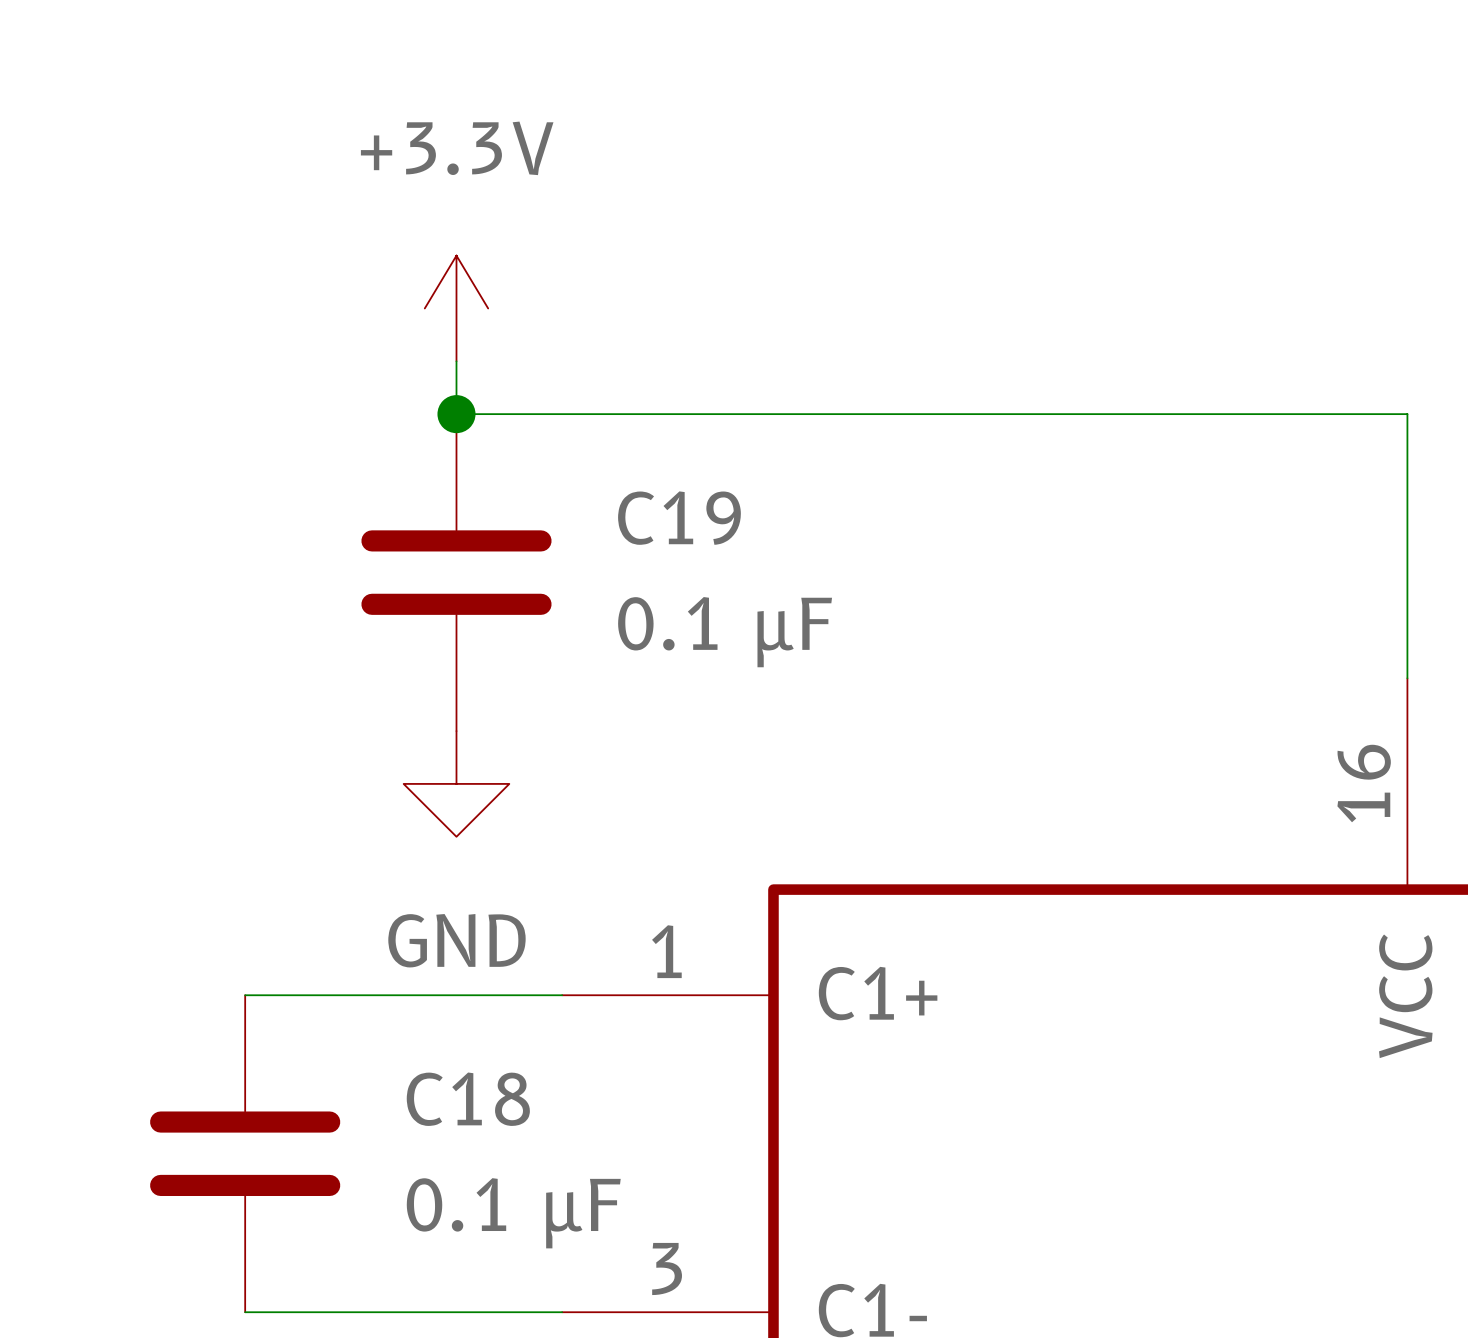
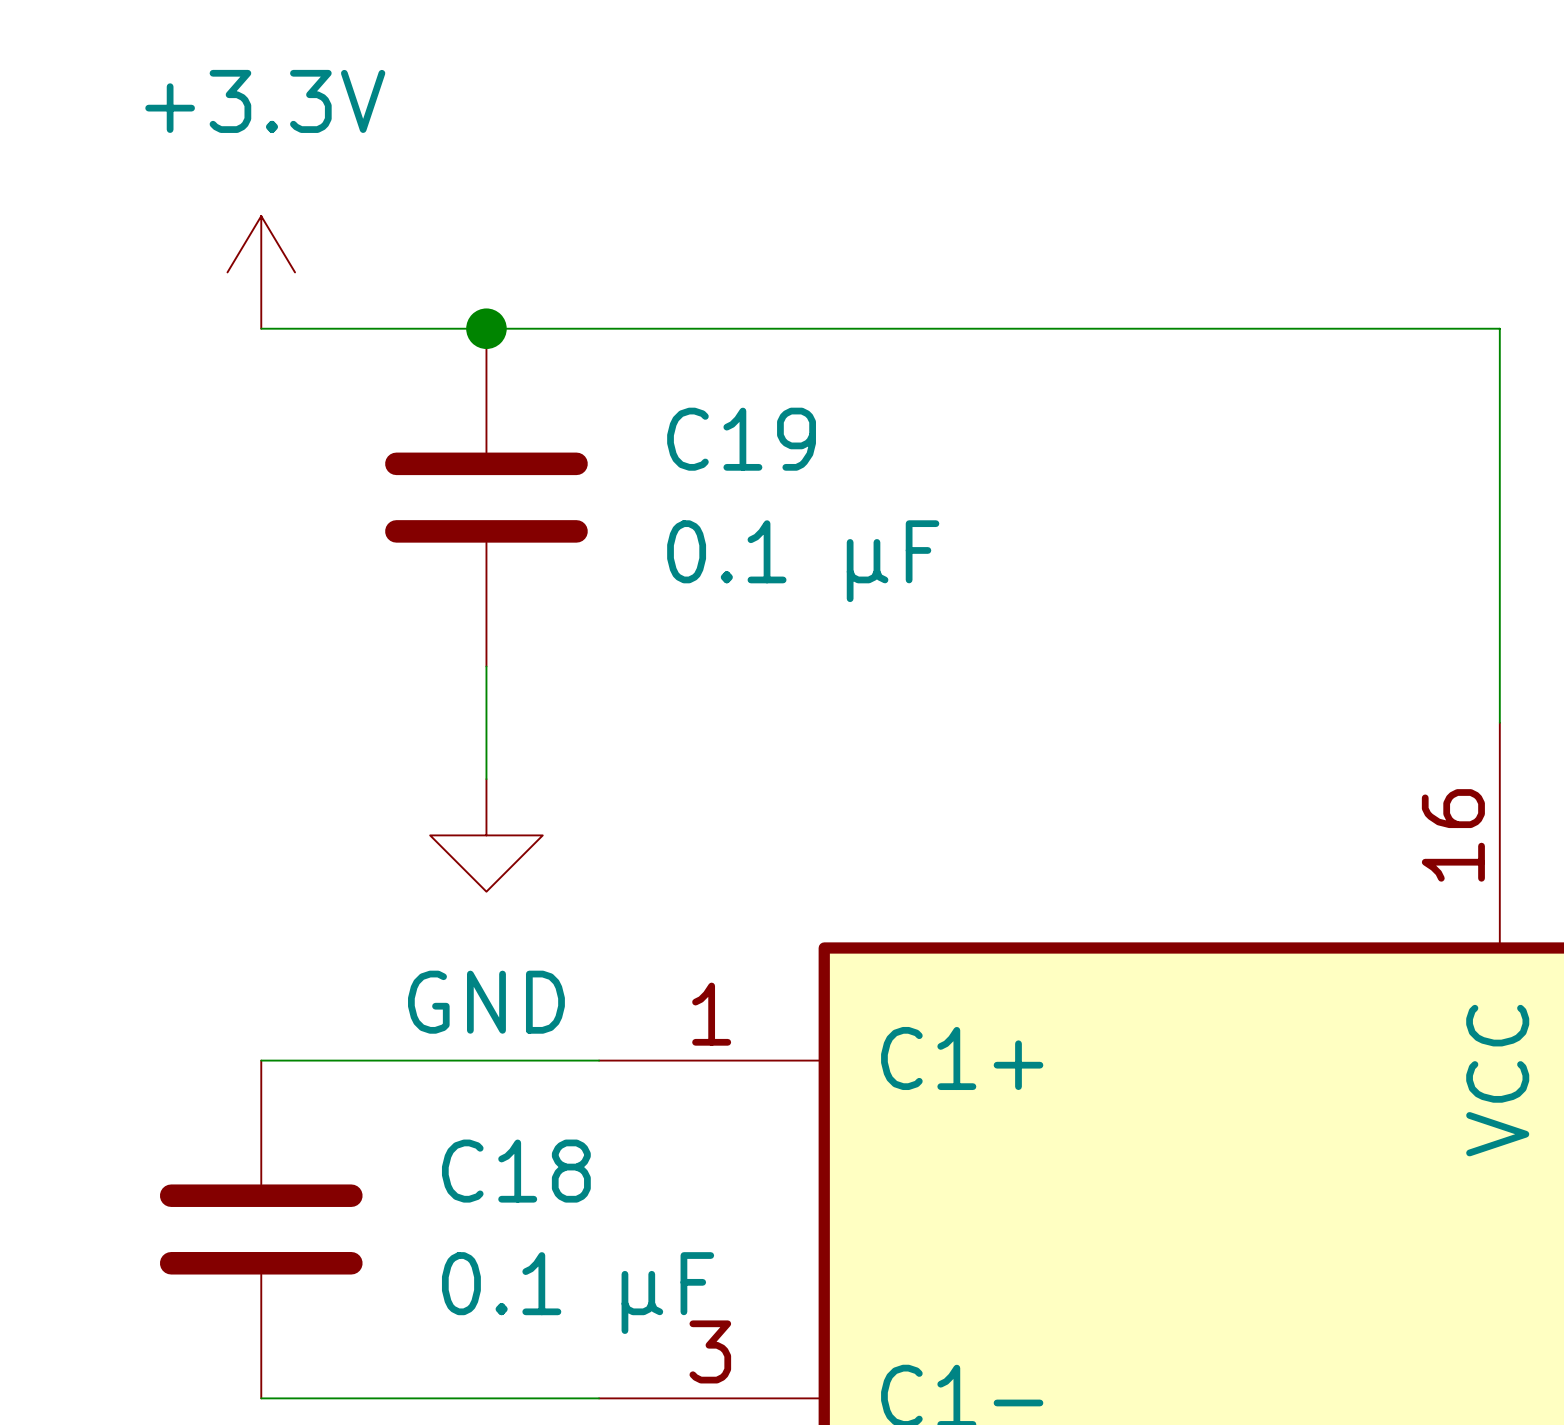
power symbol position: +3.3V (456, 308) -> +3.3V (261, 272)
wire: (456, 361) (456, 414) (1407, 414) -> (261, 328) (1499, 328) (1499, 441)
junction position: (456, 414) -> (486, 328)
C19 position: (456, 572) -> (486, 497)

